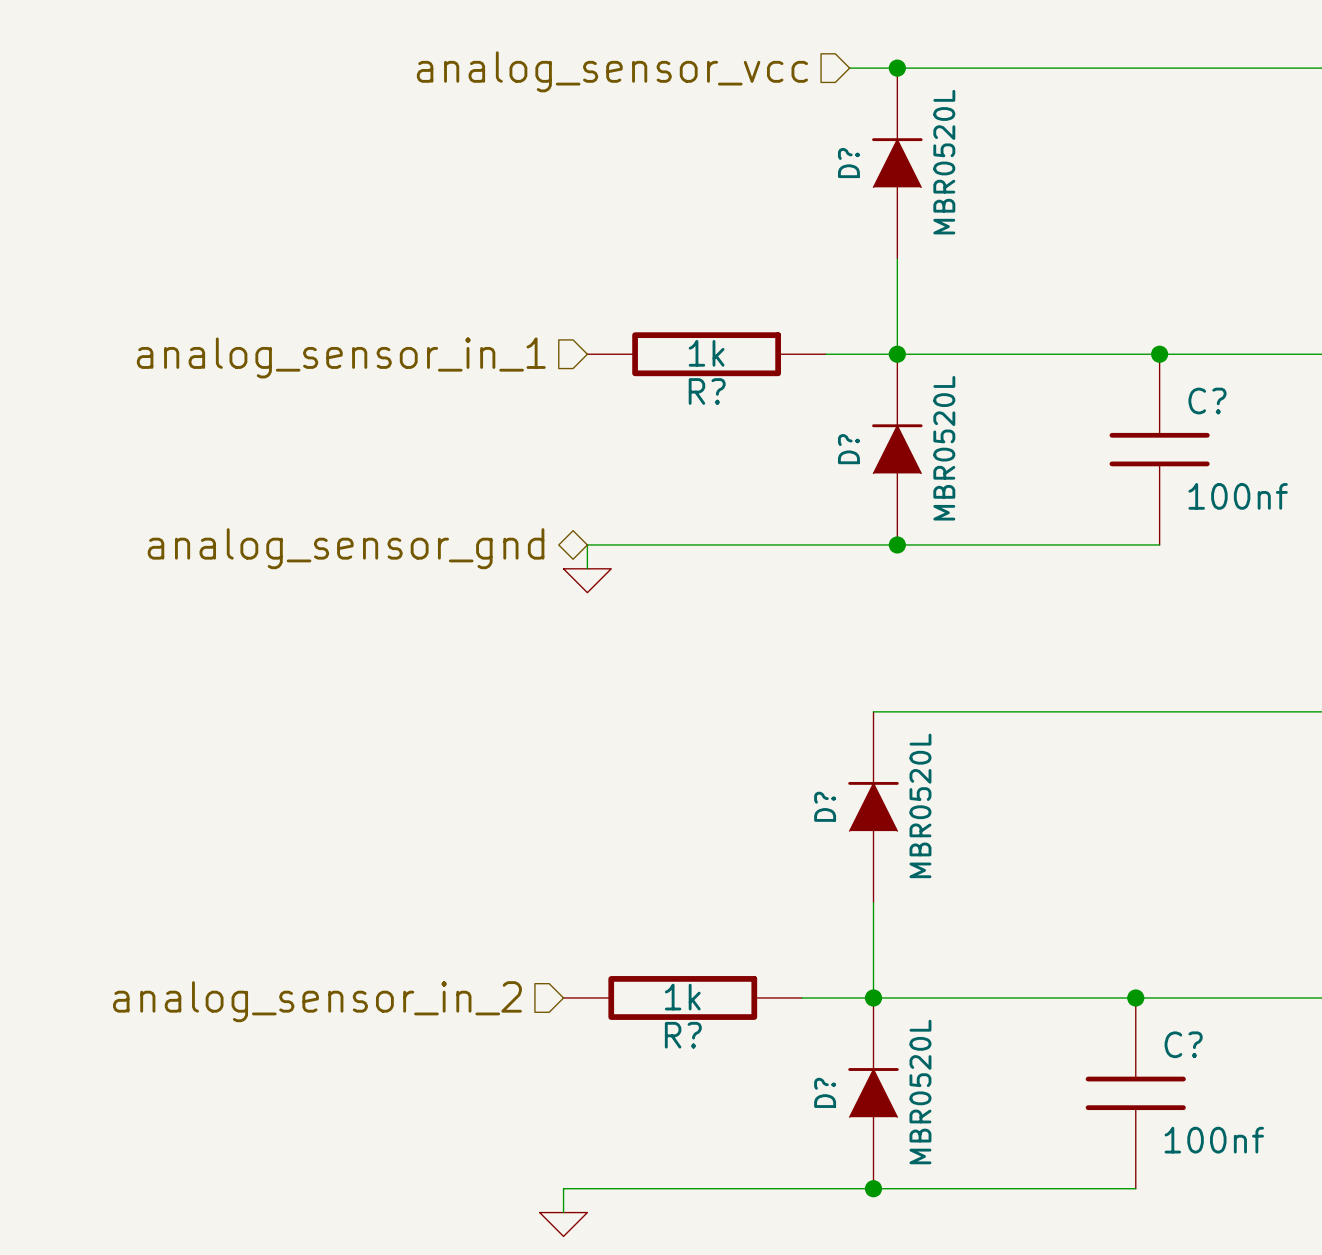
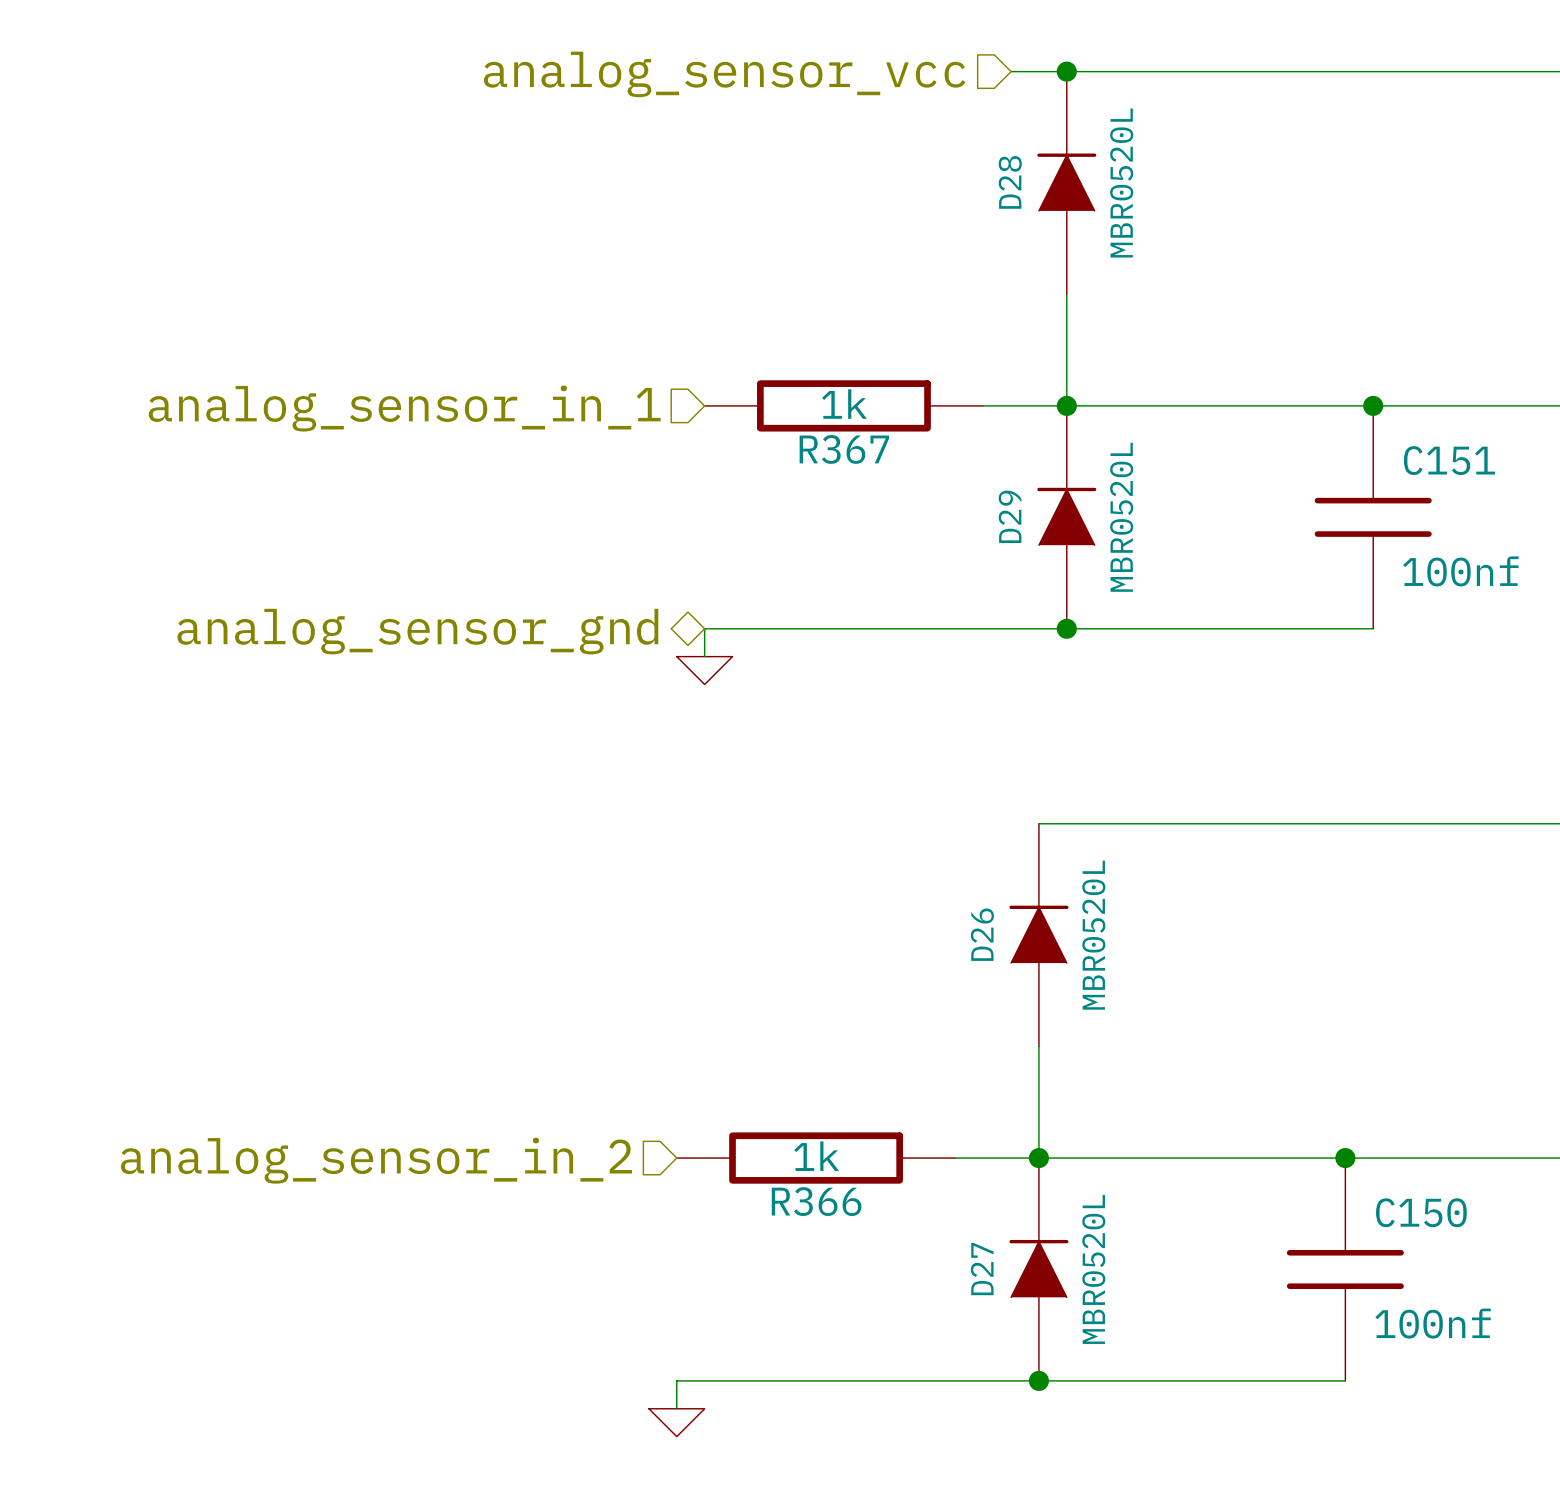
D? name: D? (848, 163) -> D28 (1010, 182)
R? name: R? (707, 391) -> R367 (844, 449)
C? name: C? (1207, 401) -> C151 (1449, 460)
D? name: D? (848, 449) -> D29 (1010, 516)
D? name: D? (825, 806) -> D26 (982, 934)
R? name: R? (683, 1035) -> R366 (816, 1201)
C? name: C? (1183, 1044) -> C150 (1421, 1212)
D? name: D? (825, 1092) -> D27 (982, 1269)

